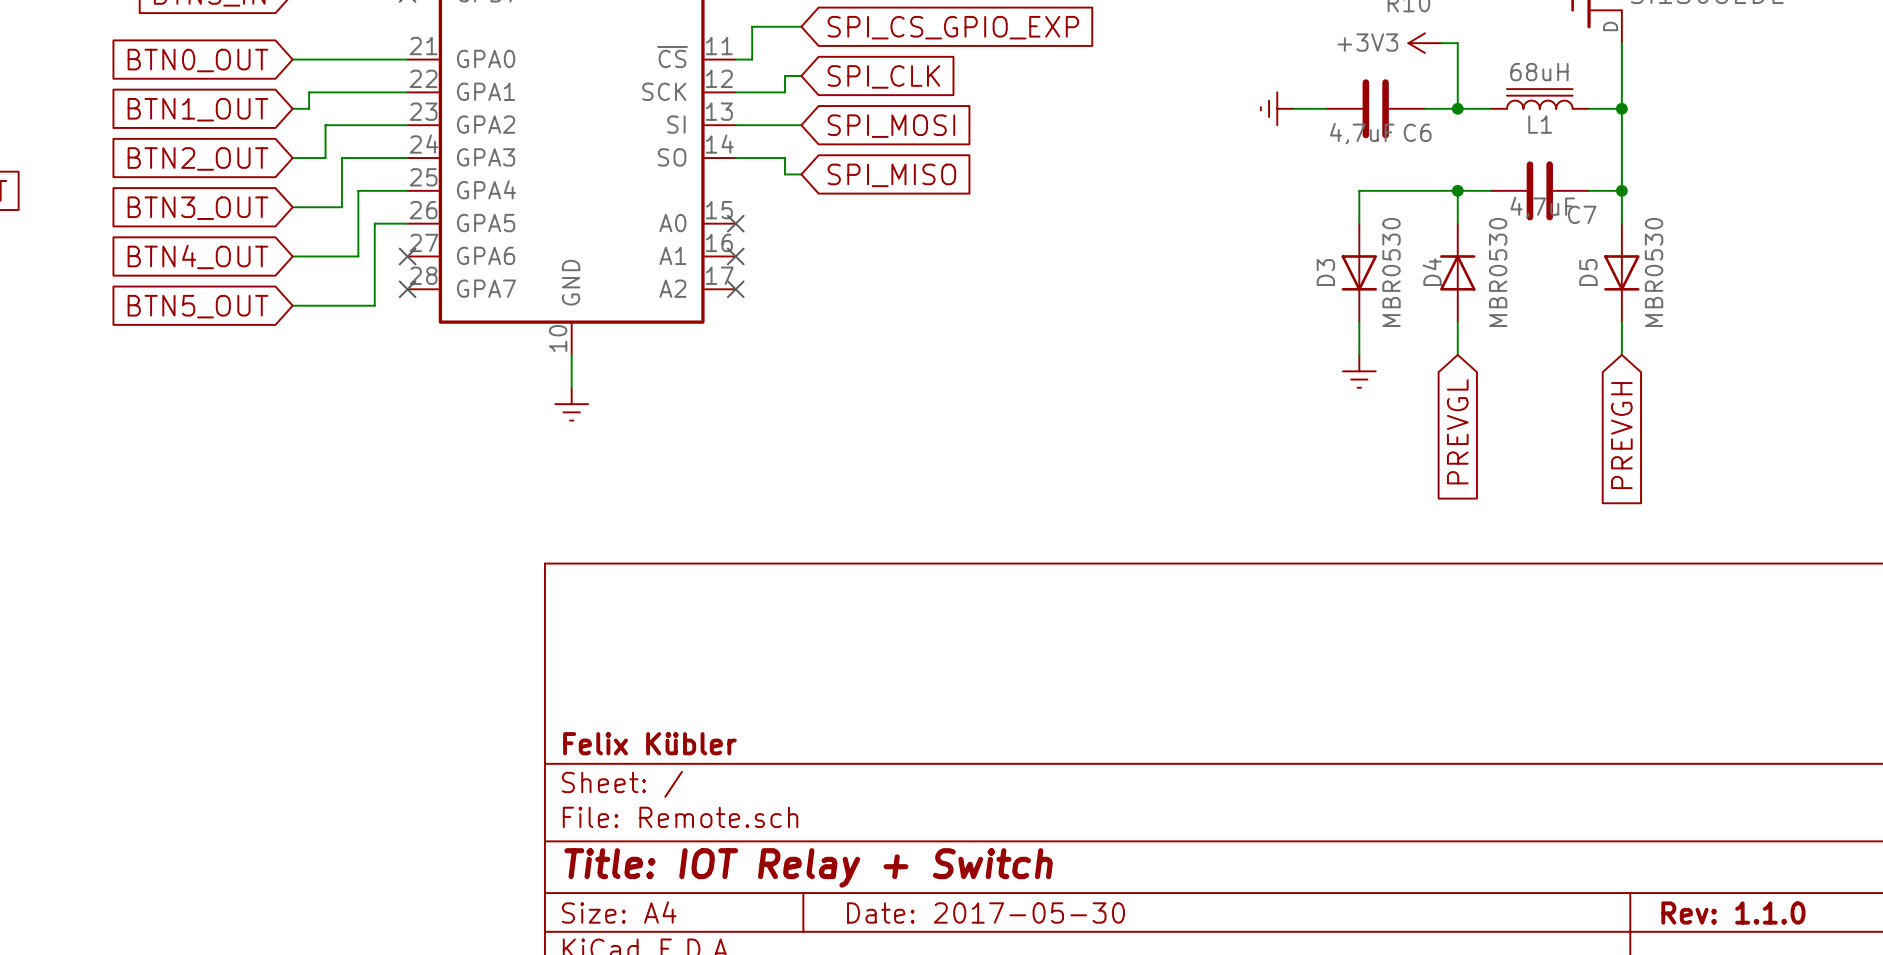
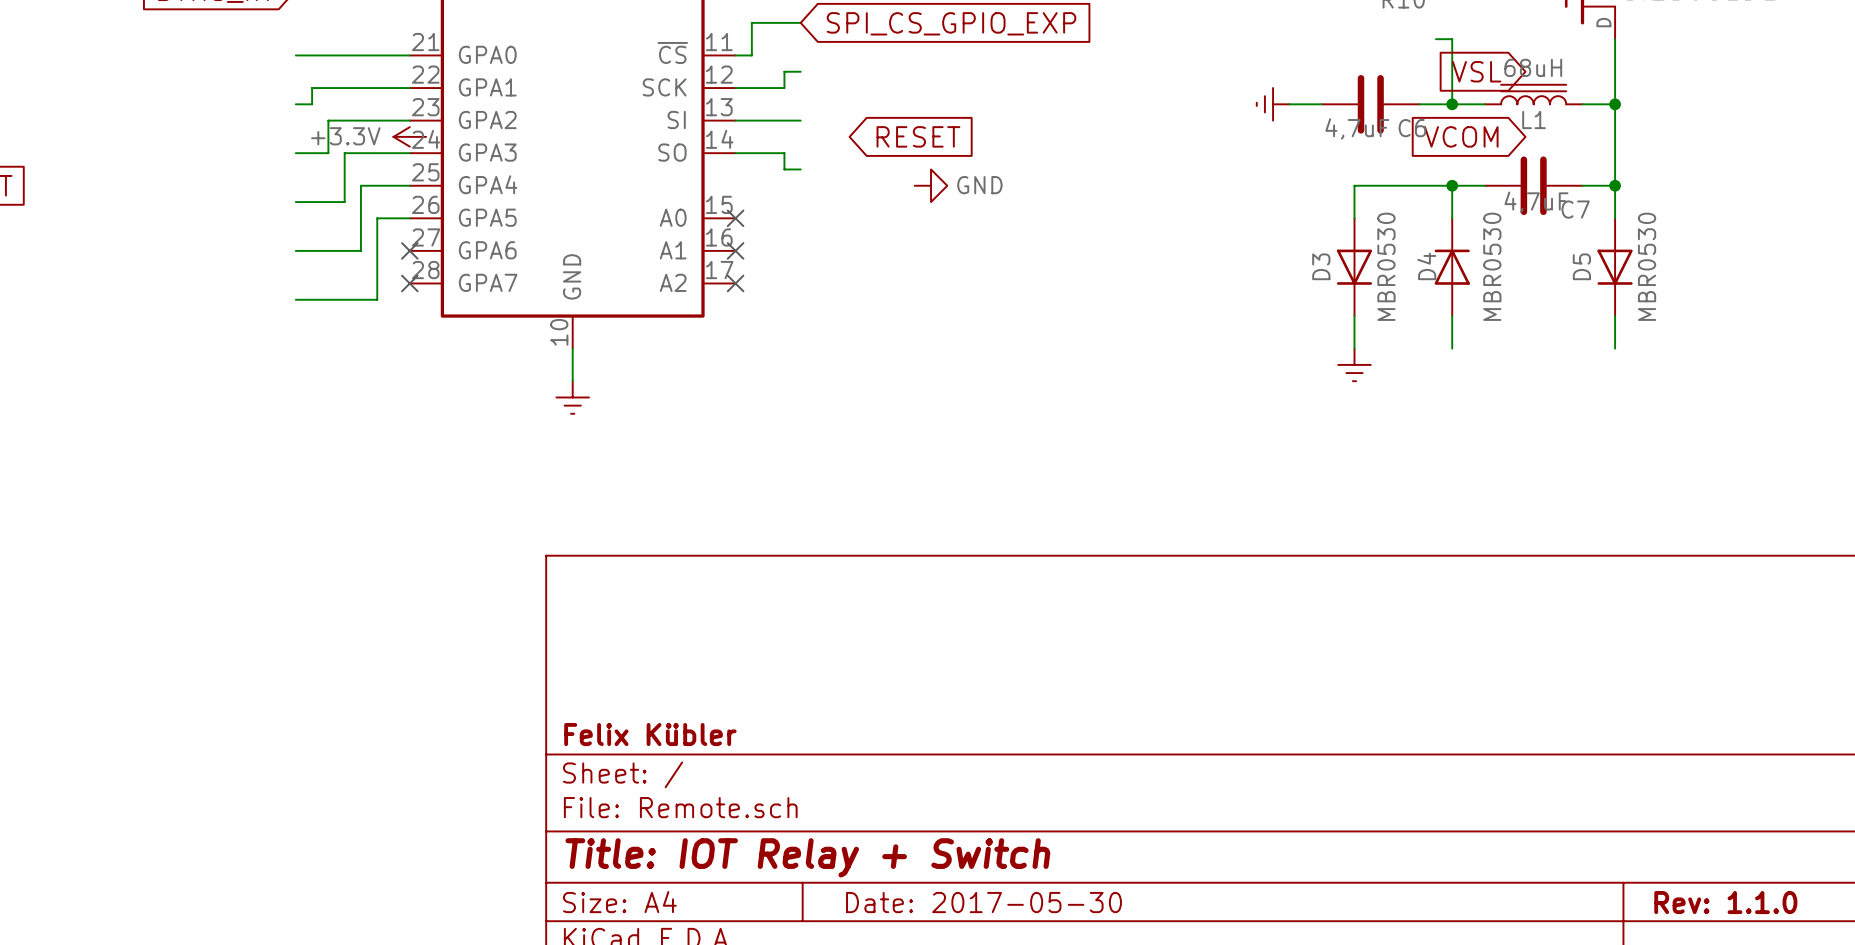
power symbol: +3V3 (1424, 43) -> none
global label: BTN0_OUT (198, 60) -> none
global label: none -> VSL (1476, 71)
global label: SPI_CLK (883, 76) -> none
global label: BTN1_OUT (198, 109) -> none
global label: SPI_MOSI (891, 126) -> none
power symbol: none -> +3.3V (409, 136)
global label: none -> RESET (918, 136)
global label: none -> VCOM (1461, 136)
global label: BTN2_OUT (198, 158) -> none
global label: SPI_MISO (891, 175) -> none
power symbol: none -> GND (931, 185)
global label: BTN3_OUT (198, 208) -> none
global label: BTN4_OUT (198, 256) -> none
global label: BTN5_OUT (198, 306) -> none
global label: PREVGL (1457, 431) -> none
global label: PREVGH (1621, 435) -> none

